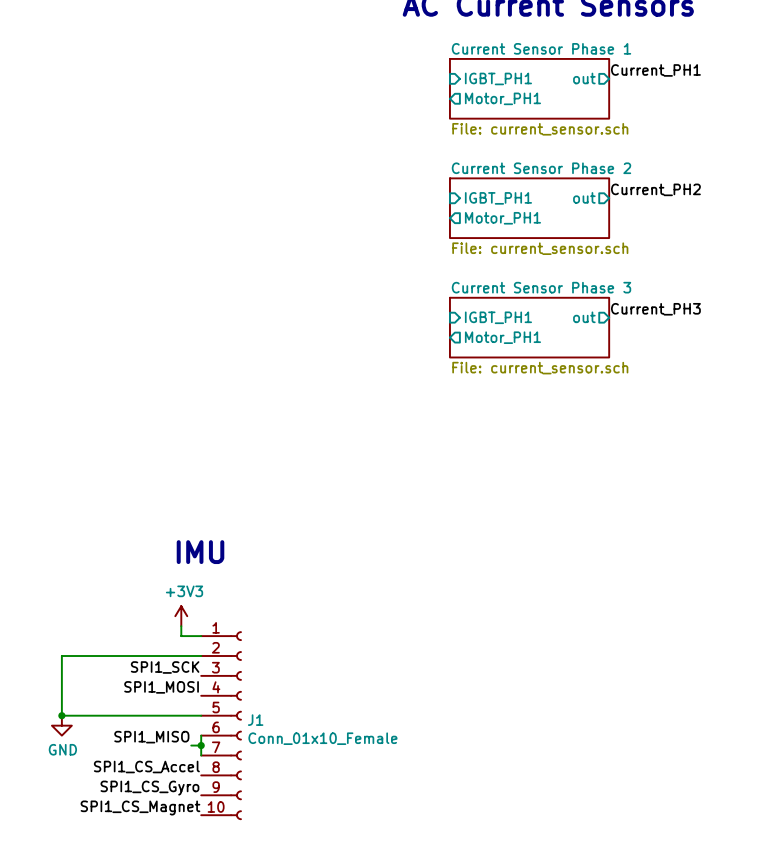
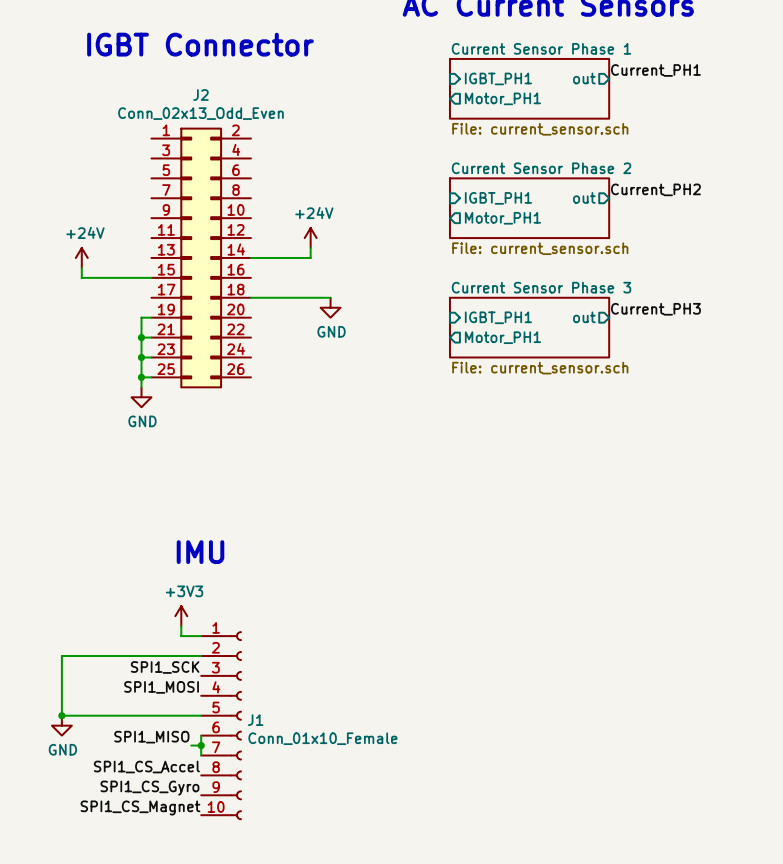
text: none -> IGBT Connector (200, 44)
power symbol: none -> +24V (310, 238)
wire: none -> (310, 248) (310, 257) (250, 257)
power symbol: none -> +24V (81, 257)
J2: none -> Conn_02x13_Odd_Even (201, 257)
wire: none -> (81, 267) (81, 277) (151, 277)
wire: none -> (250, 297) (330, 297)
power symbol: none -> GND (330, 307)
wire: none -> (151, 317) (141, 317) (141, 387)
wire: none -> (141, 337) (151, 337)
junction: none -> (141, 337)
wire: none -> (141, 357) (151, 357)
junction: none -> (141, 357)
wire: none -> (141, 377) (151, 377)
junction: none -> (141, 377)
power symbol: none -> GND (141, 397)

